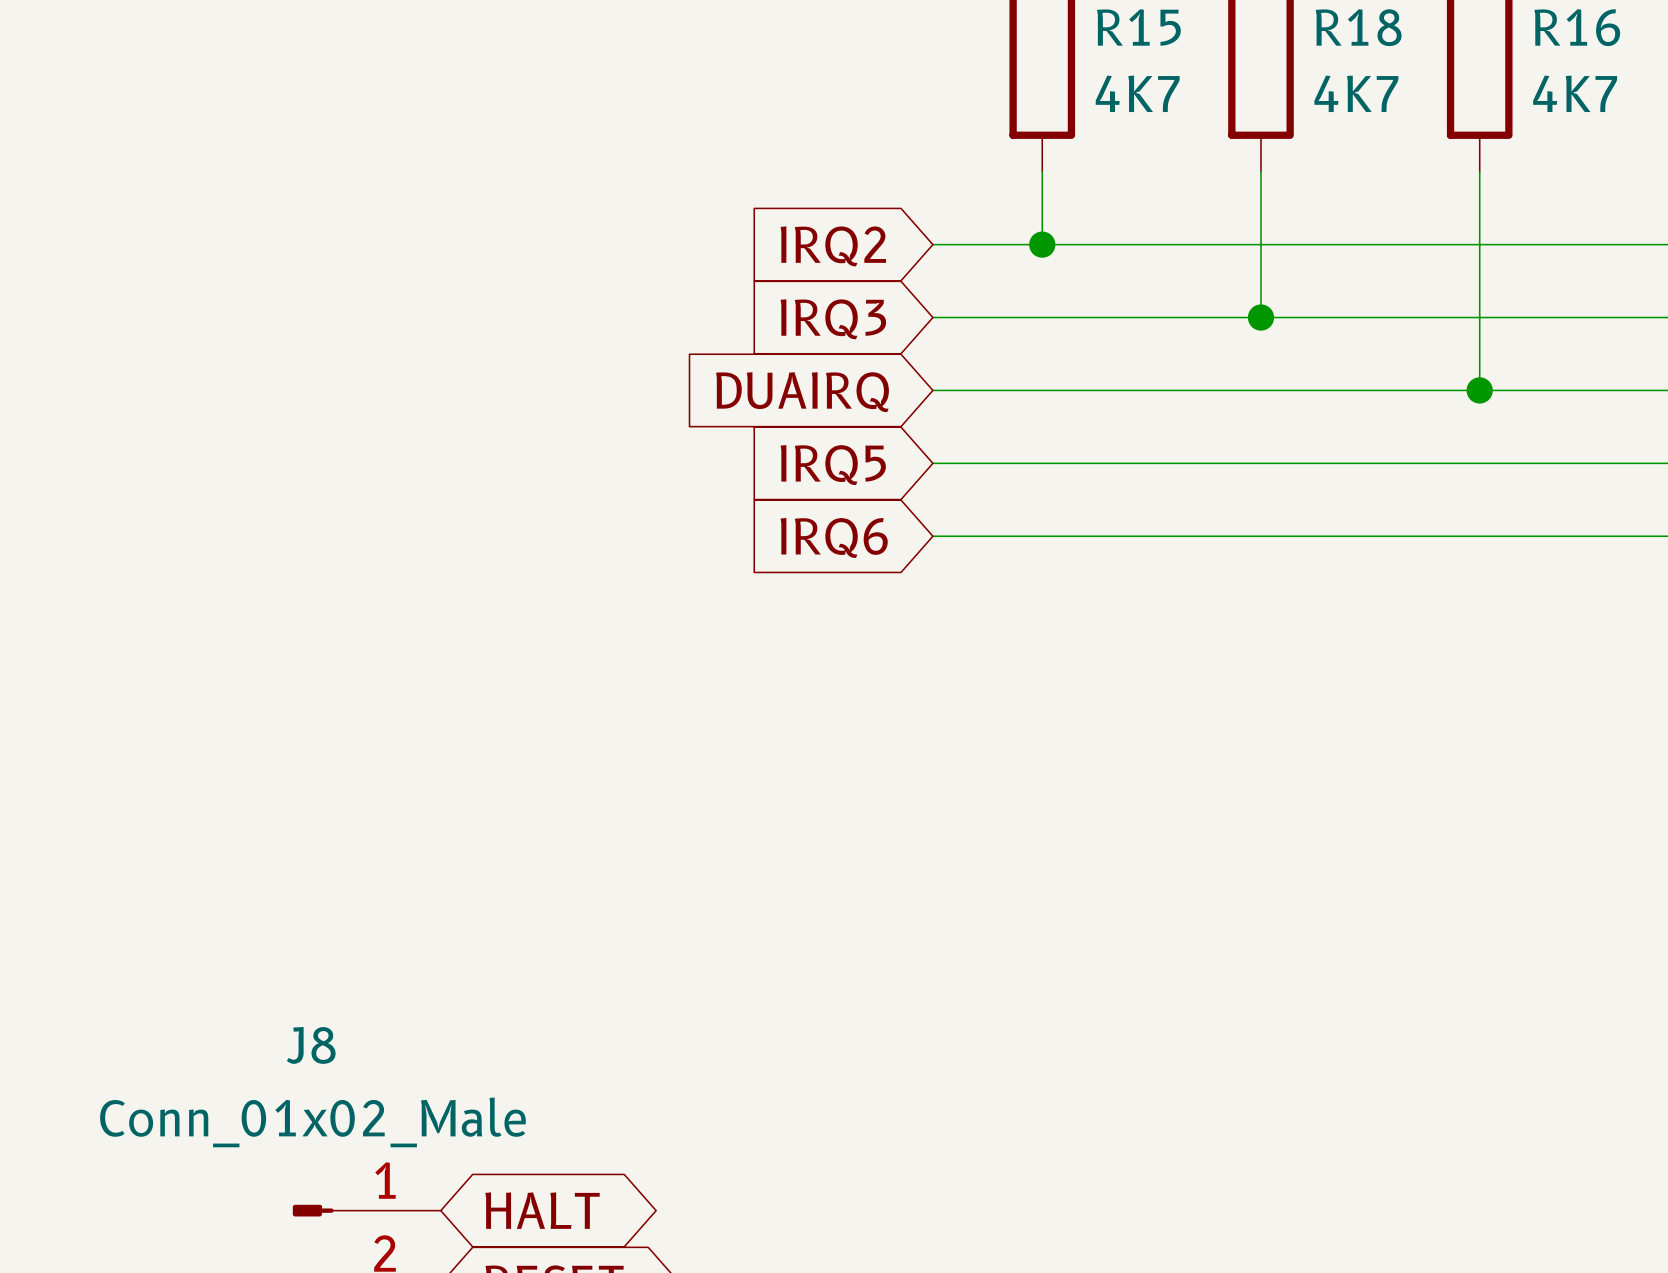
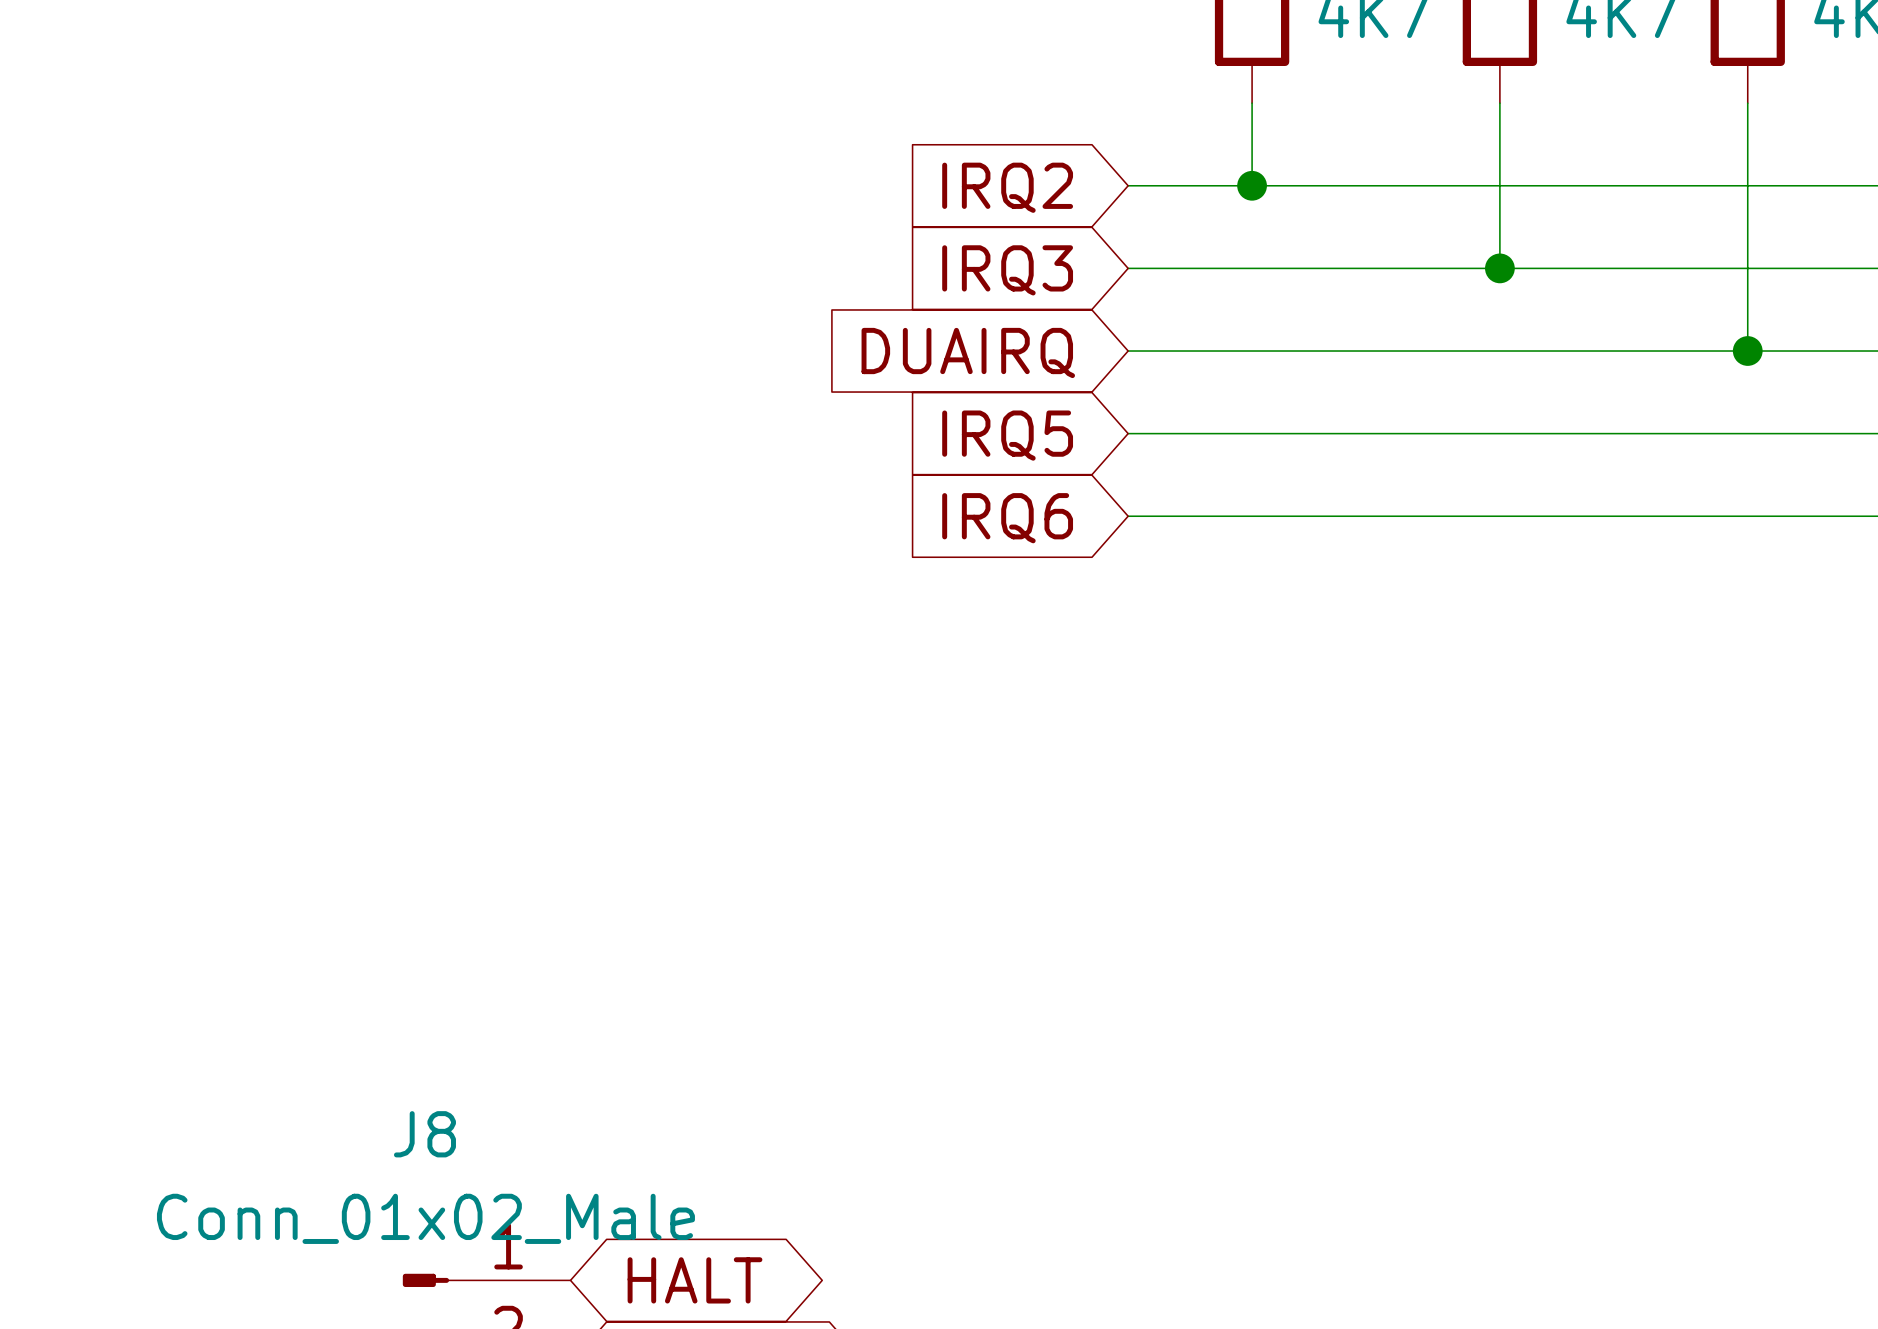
J8 name position: J8 (311, 1045) -> J8 (424, 1134)
J8 value position: Conn_01x02_Male (312, 1122) -> Conn_01x02_Male (425, 1218)

